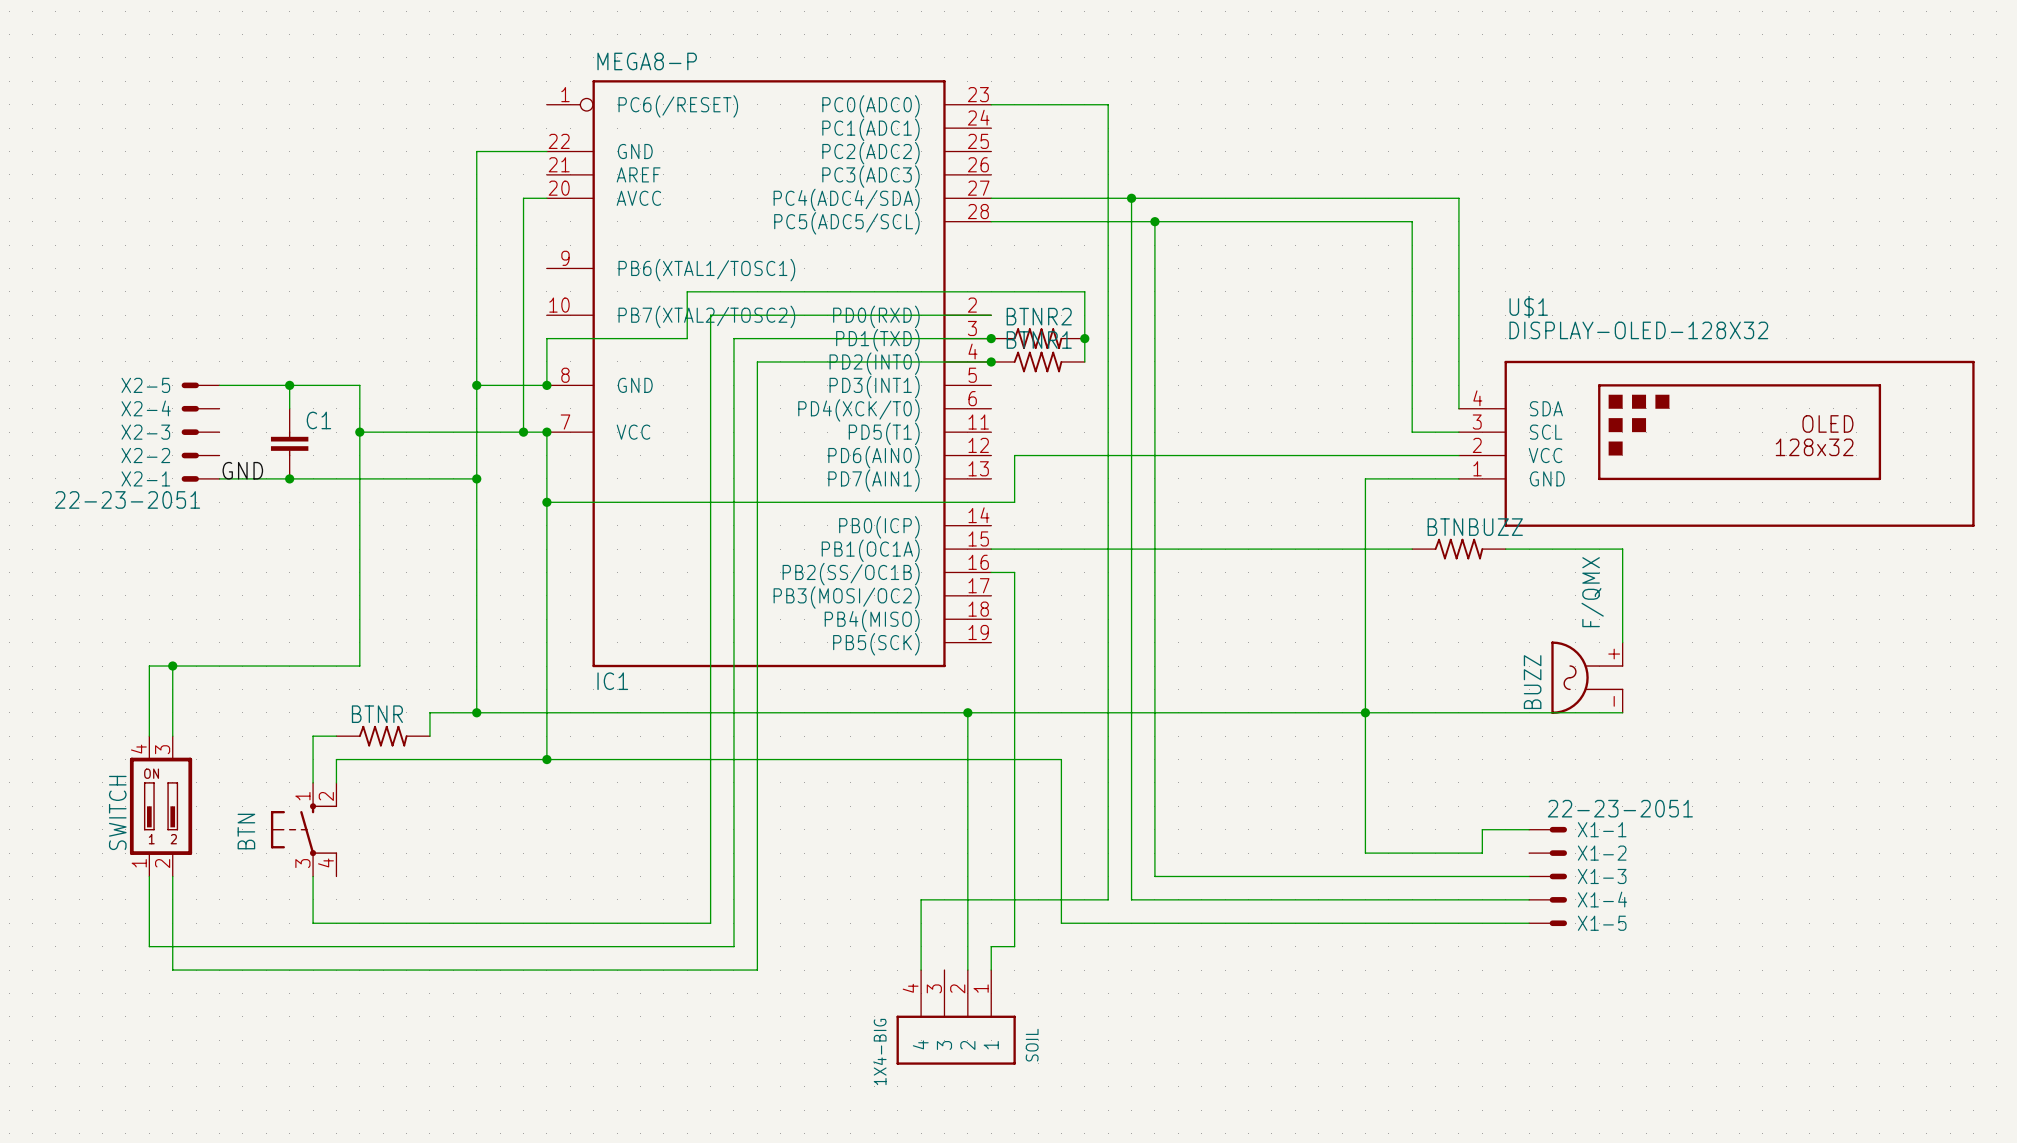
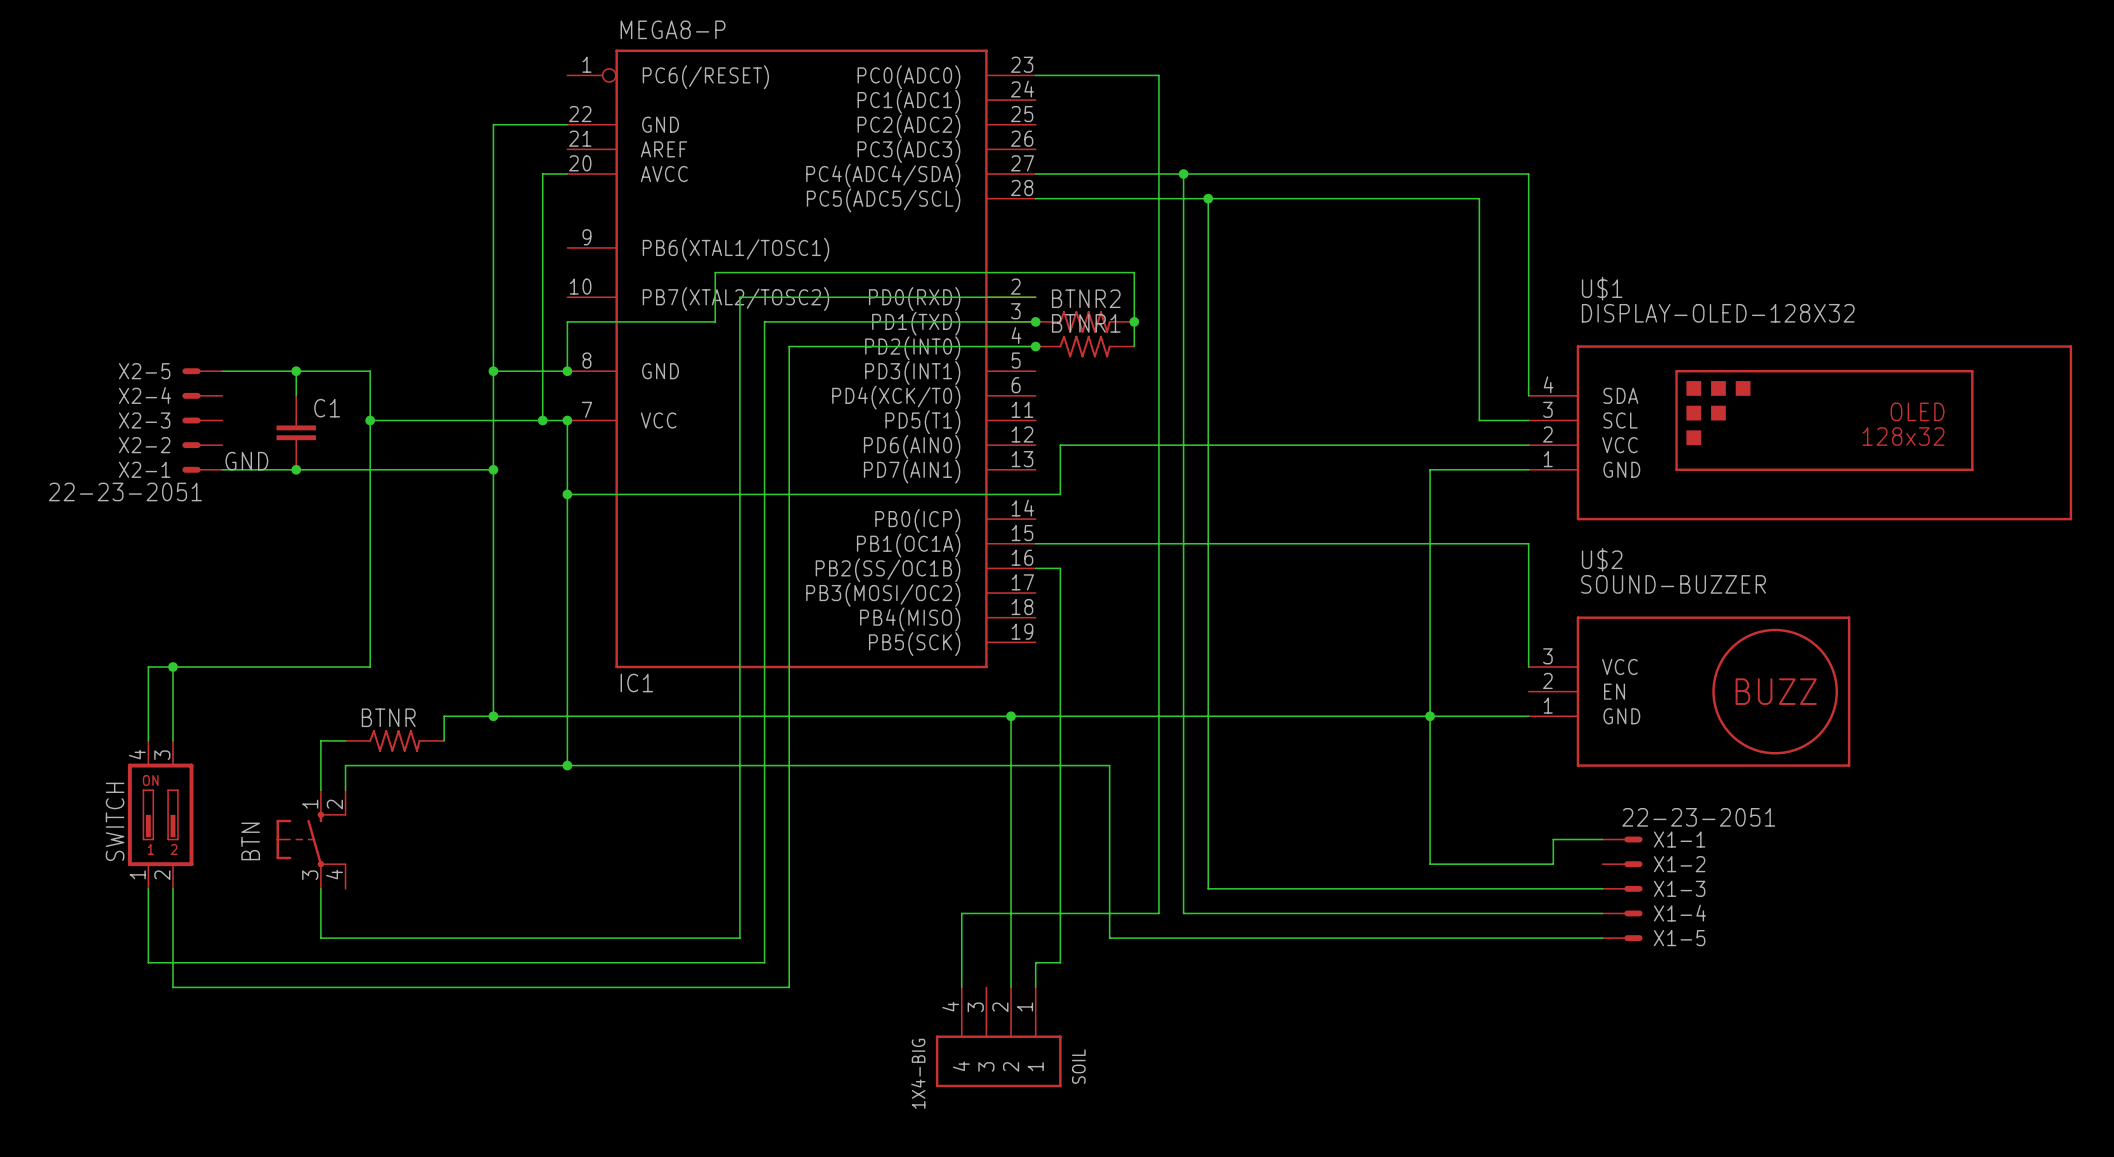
wire: none -> (1479, 543) (1528, 543) (1528, 666)
BTNBUZZ: (1458, 549) -> none
wire: (1505, 549) (1622, 549) (1622, 642) -> none
BUZZ: F/QMX (1587, 677) -> none
U$2: none -> SOUND-BUZZER (1689, 691)
wire: (1458, 712) (1622, 712) -> none

